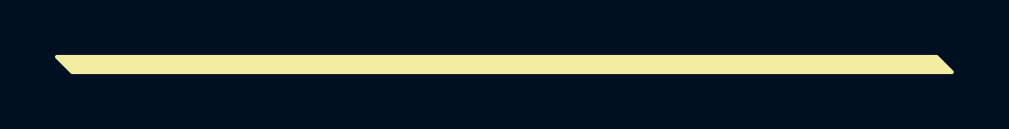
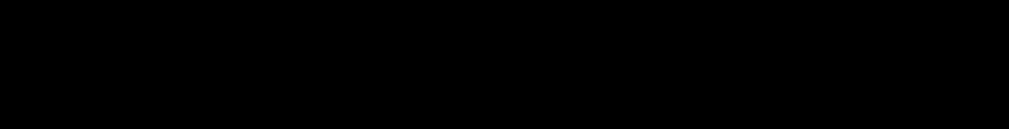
drawing: [54, 54, 954, 75] -> none

